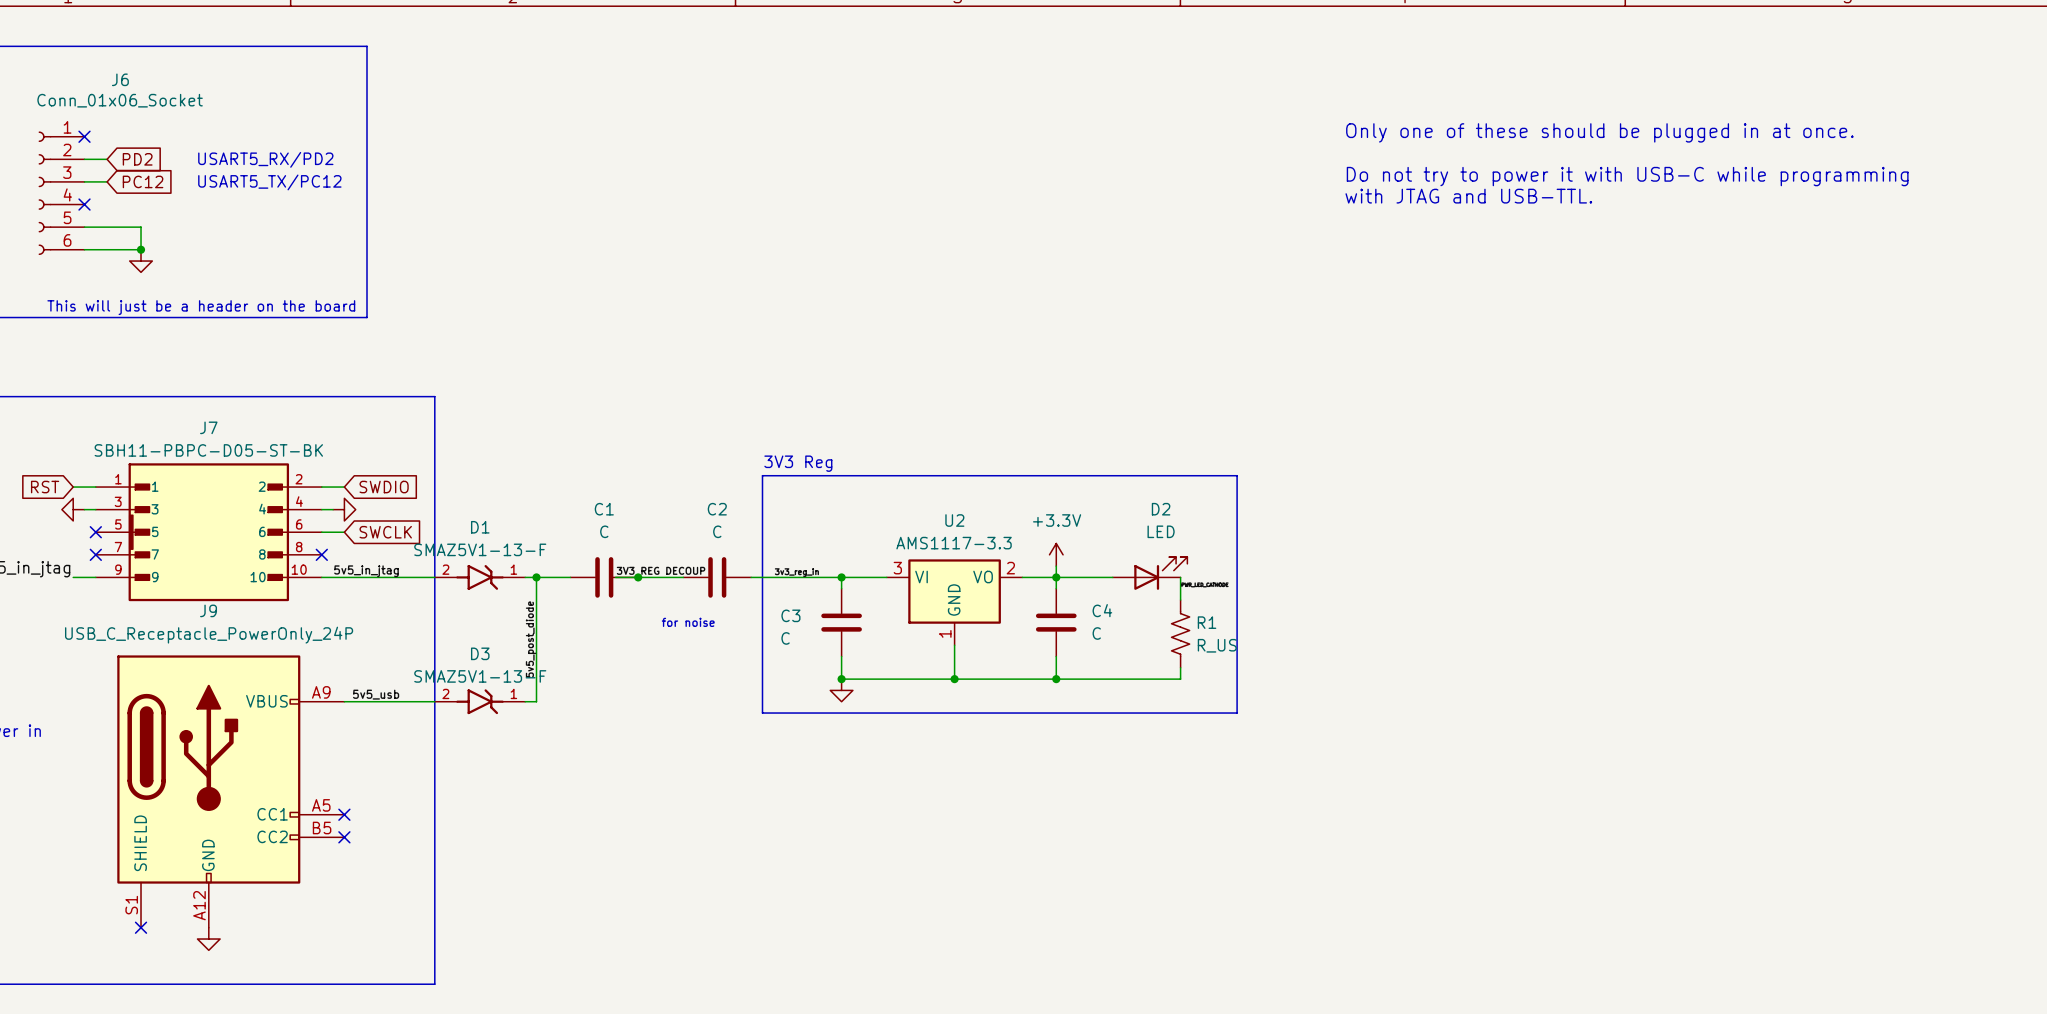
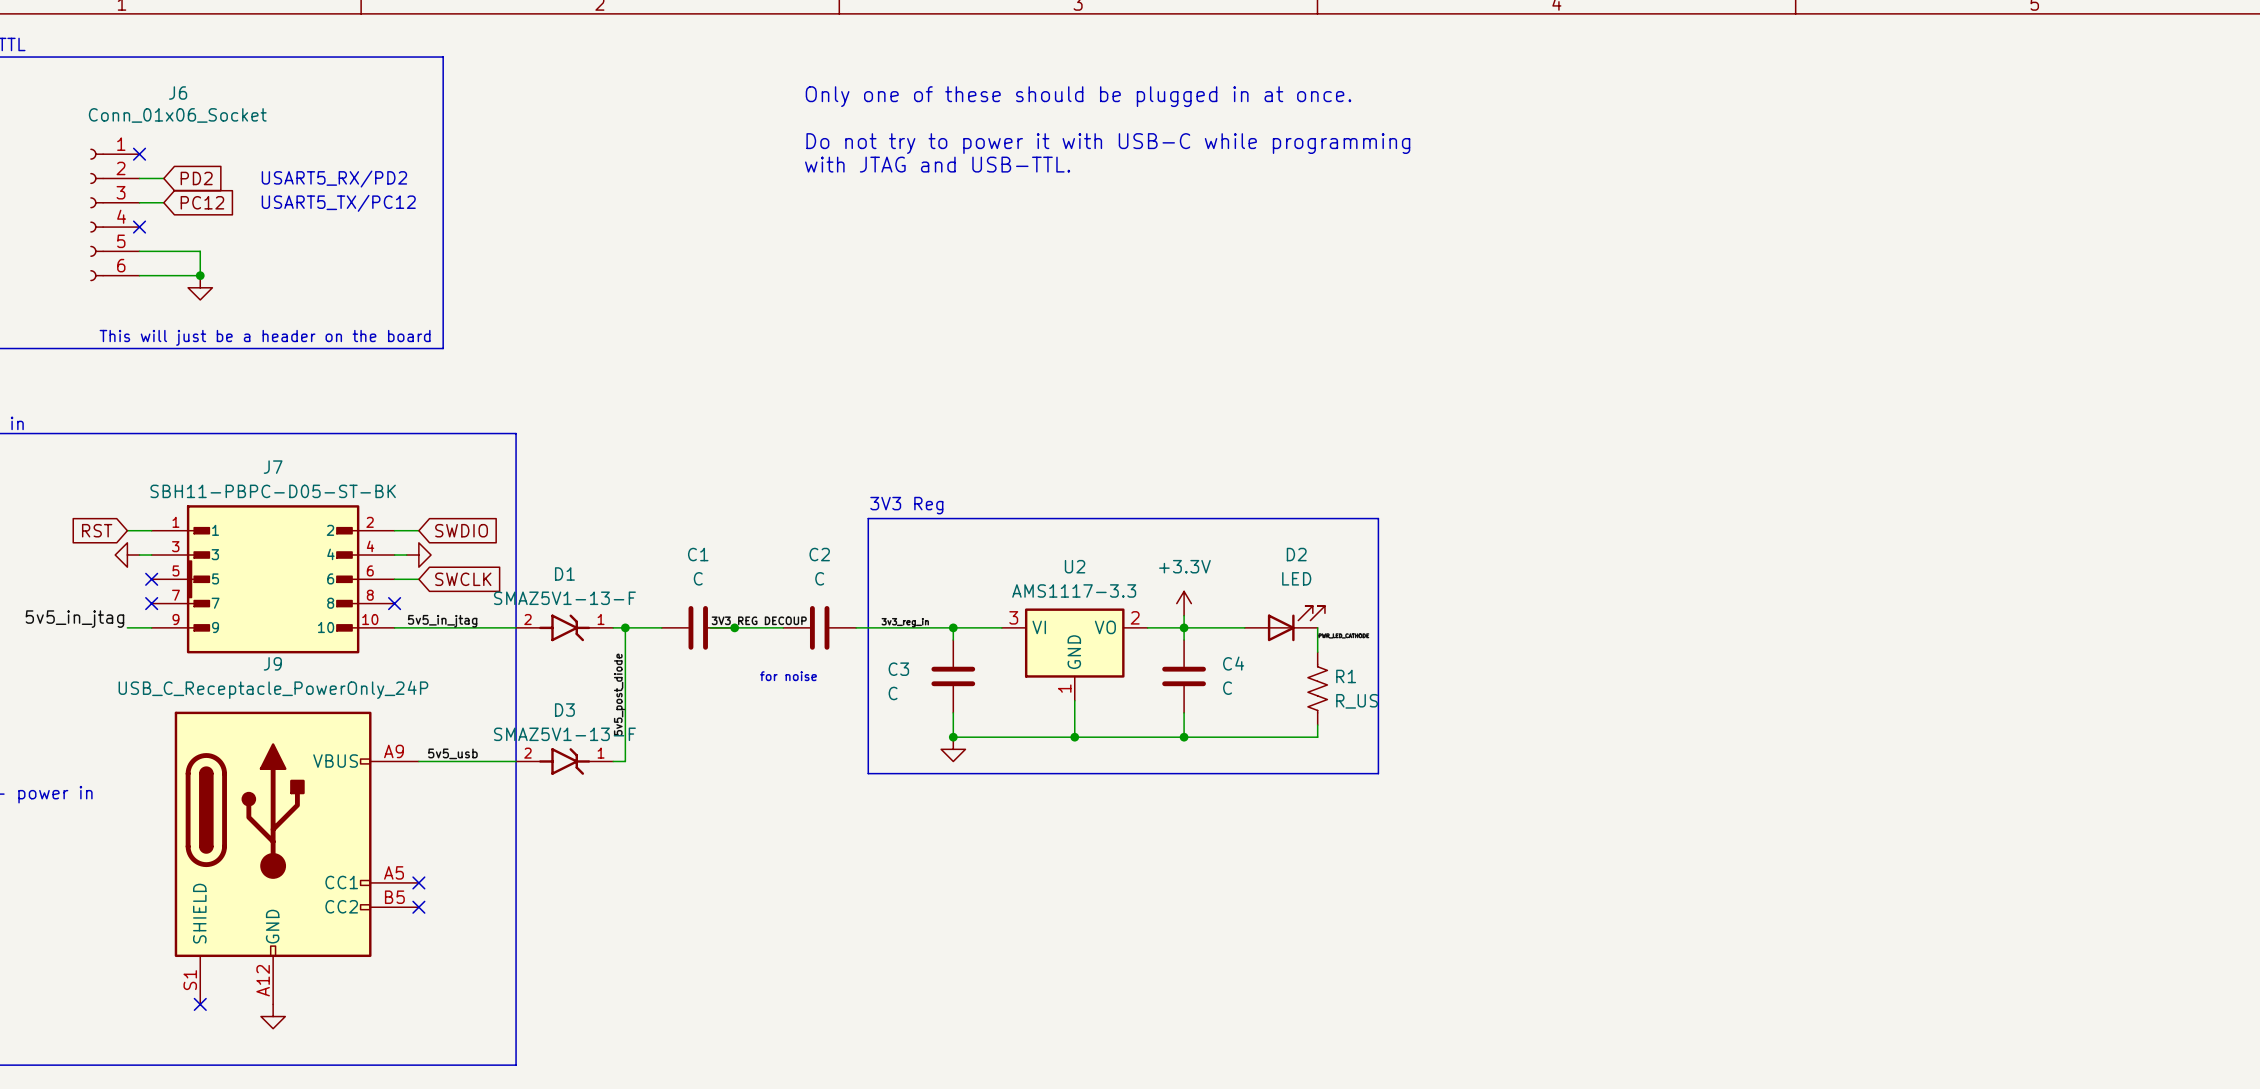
text: none -> Only one of these should be plugged in at once. (1078, 96)
text: none -> Do not try to power it with USB-C while programming (1108, 143)
text: Only one of these should be plugged in at once. (1599, 132) -> none
text: none -> with JTAG and USB-TTL. (937, 164)
text: Do not try to power it with USB-C while programming (1627, 176) -> none
text: with JTAG and USB-TTL. (1468, 196) -> none

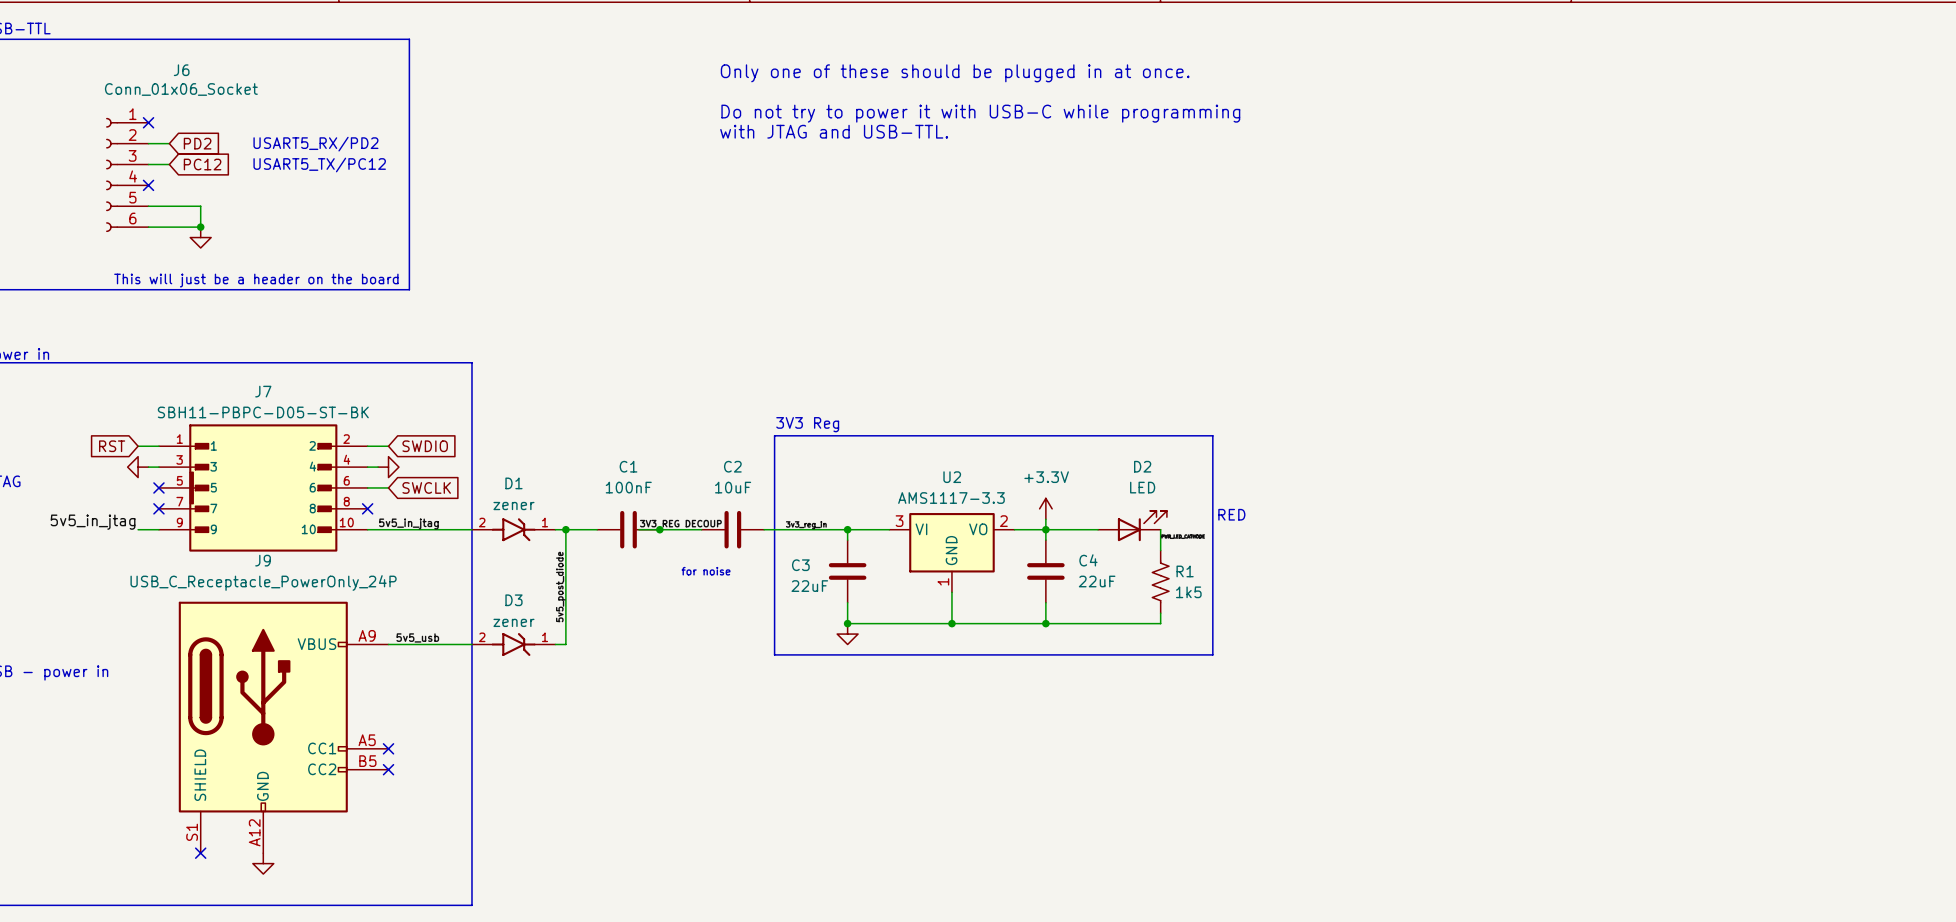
C1 value: C (698, 578) -> 100nF (628, 487)
C2 value: C (819, 578) -> 10uF (733, 487)
D1 value: SMAZ5V1-13-F (564, 598) -> zener (513, 506)
text: none -> RED (1231, 514)
C4 value: C (1227, 688) -> 22uF (1097, 581)
C3 value: C (893, 693) -> 22uF (809, 586)
R1 value: R_US (1357, 701) -> 1k5 (1188, 592)
D3 value: SMAZ5V1-13-F (564, 734) -> zener (513, 622)

